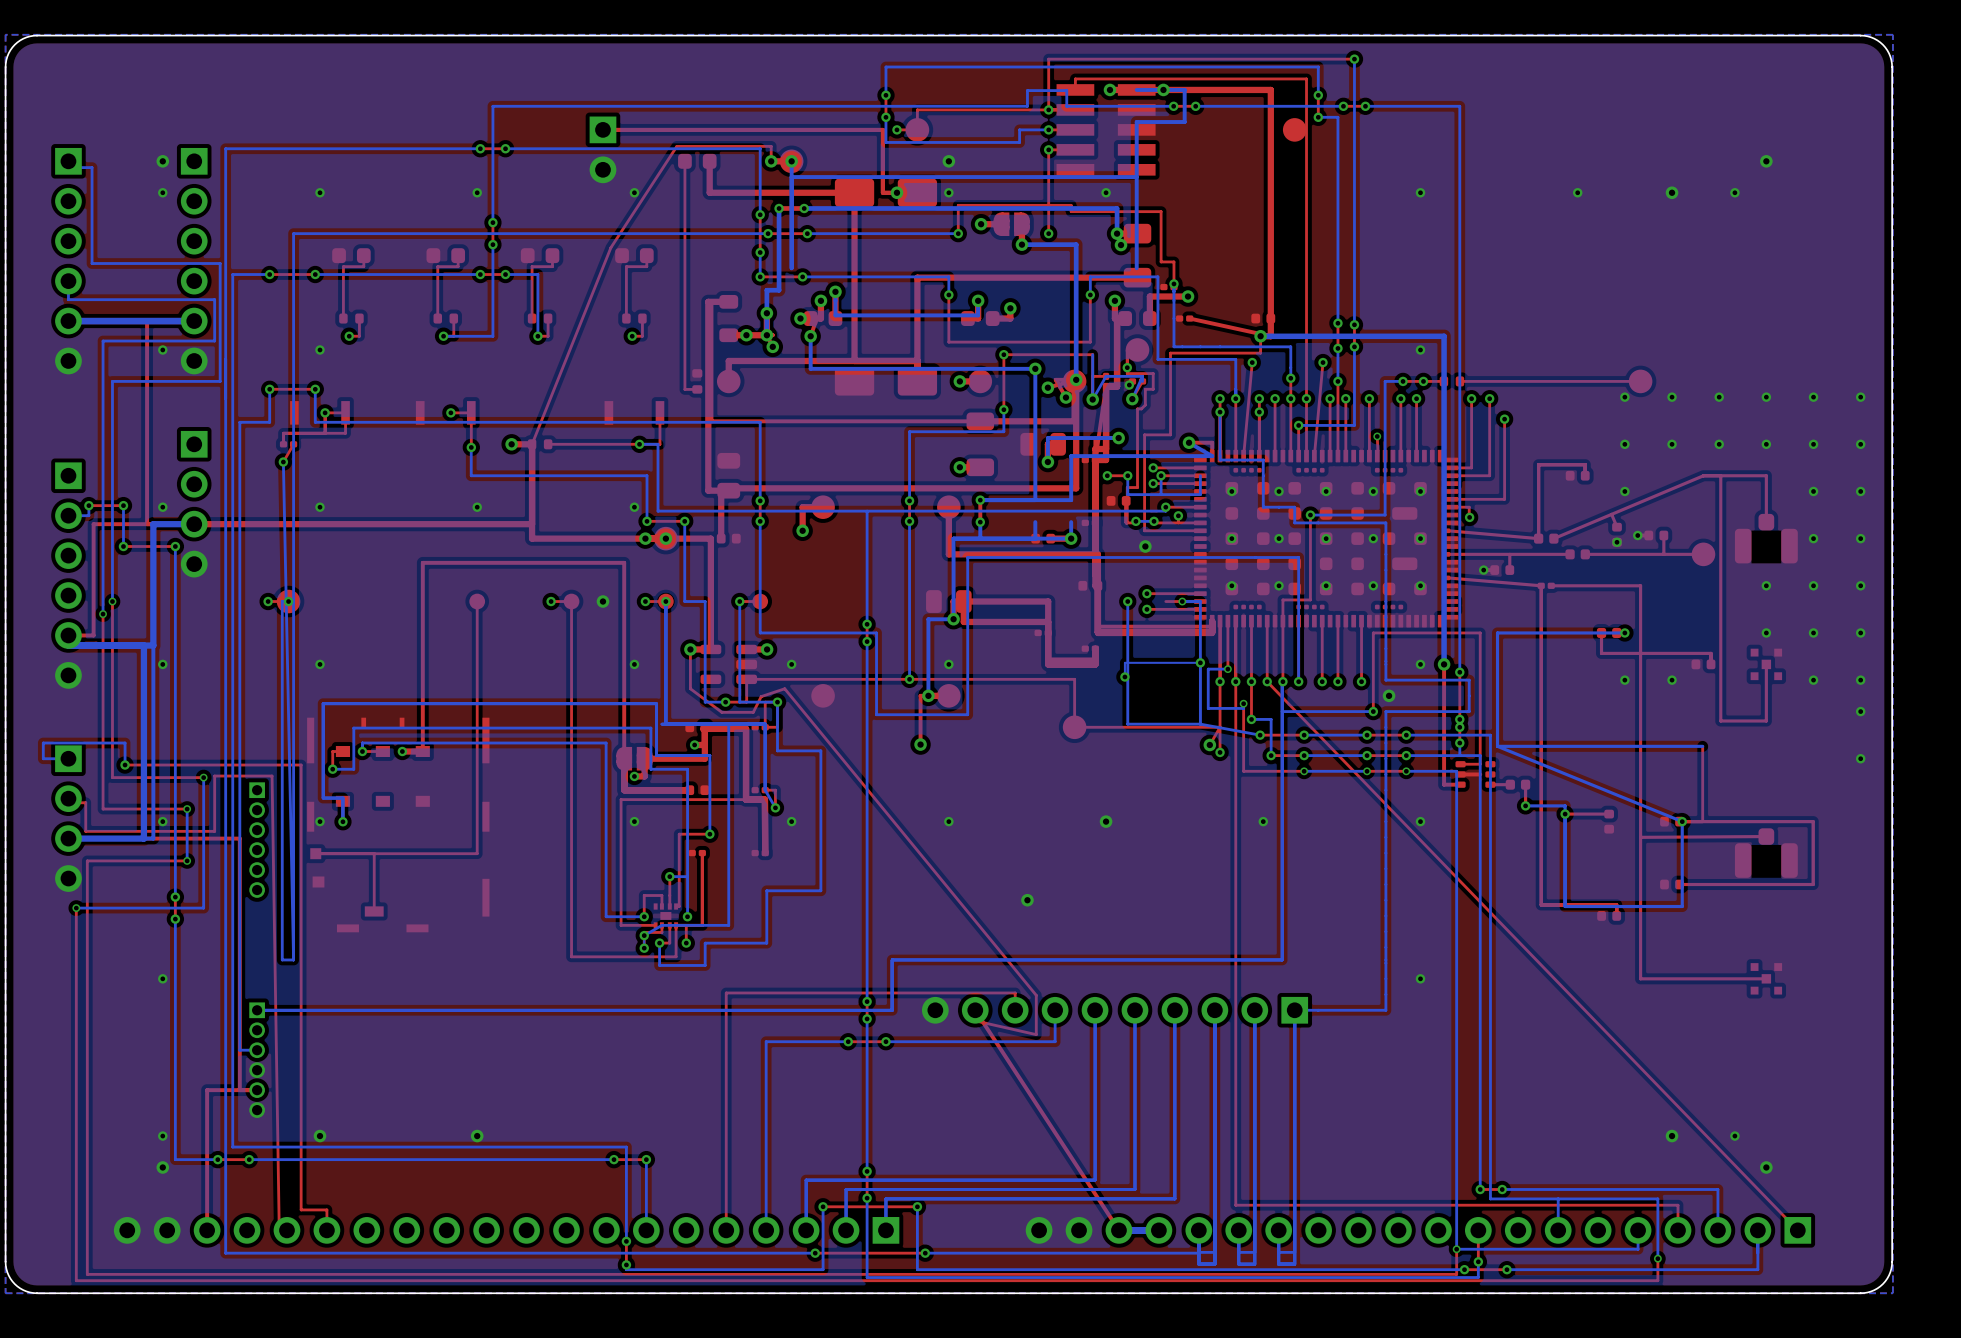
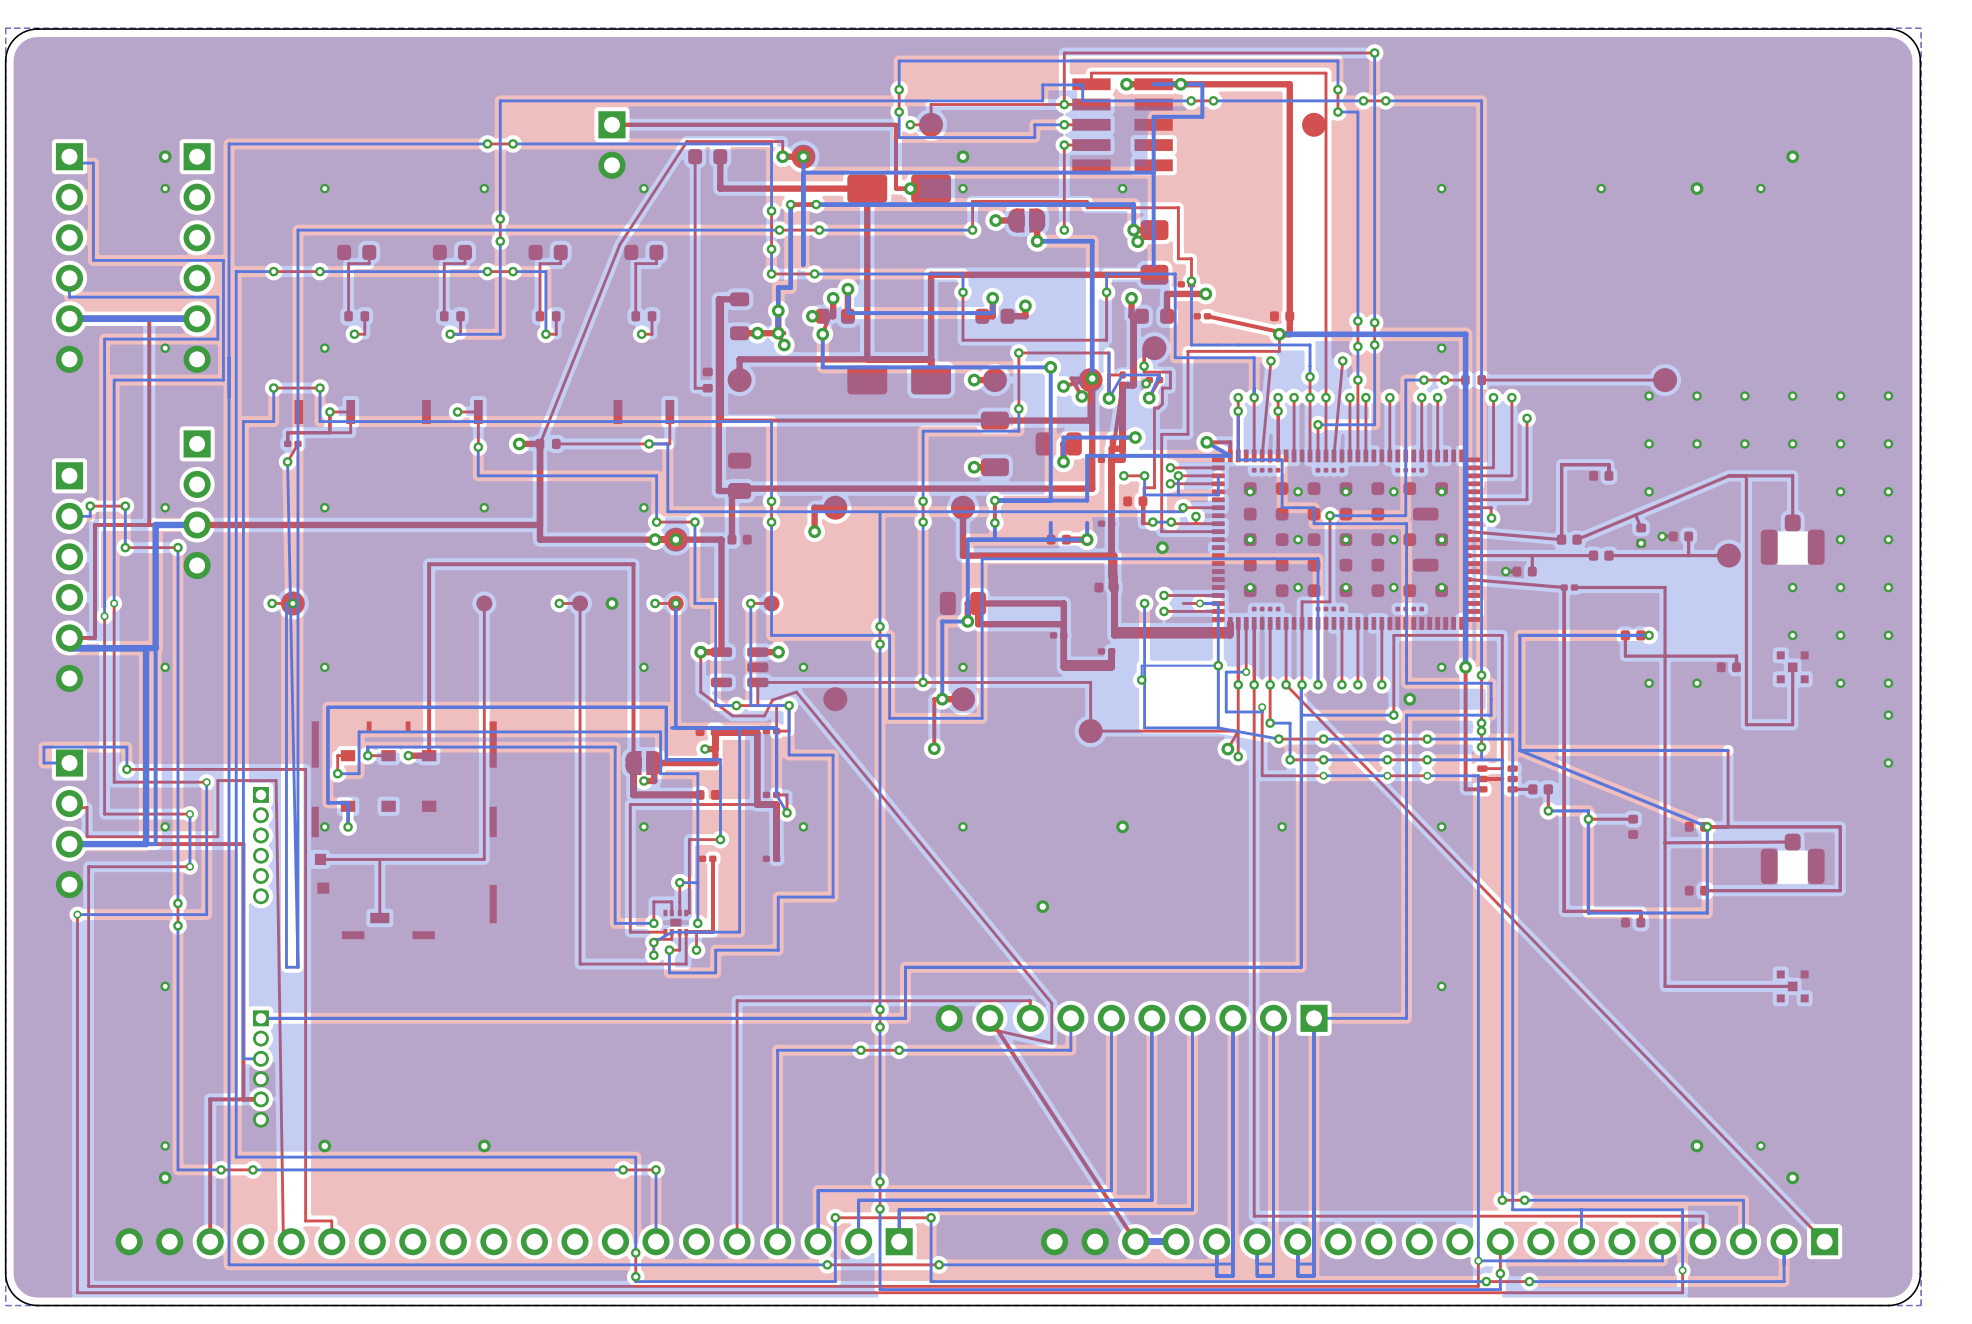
top track: (1377, 436) (1377, 450) -> none
via: (1377, 436) -> none

